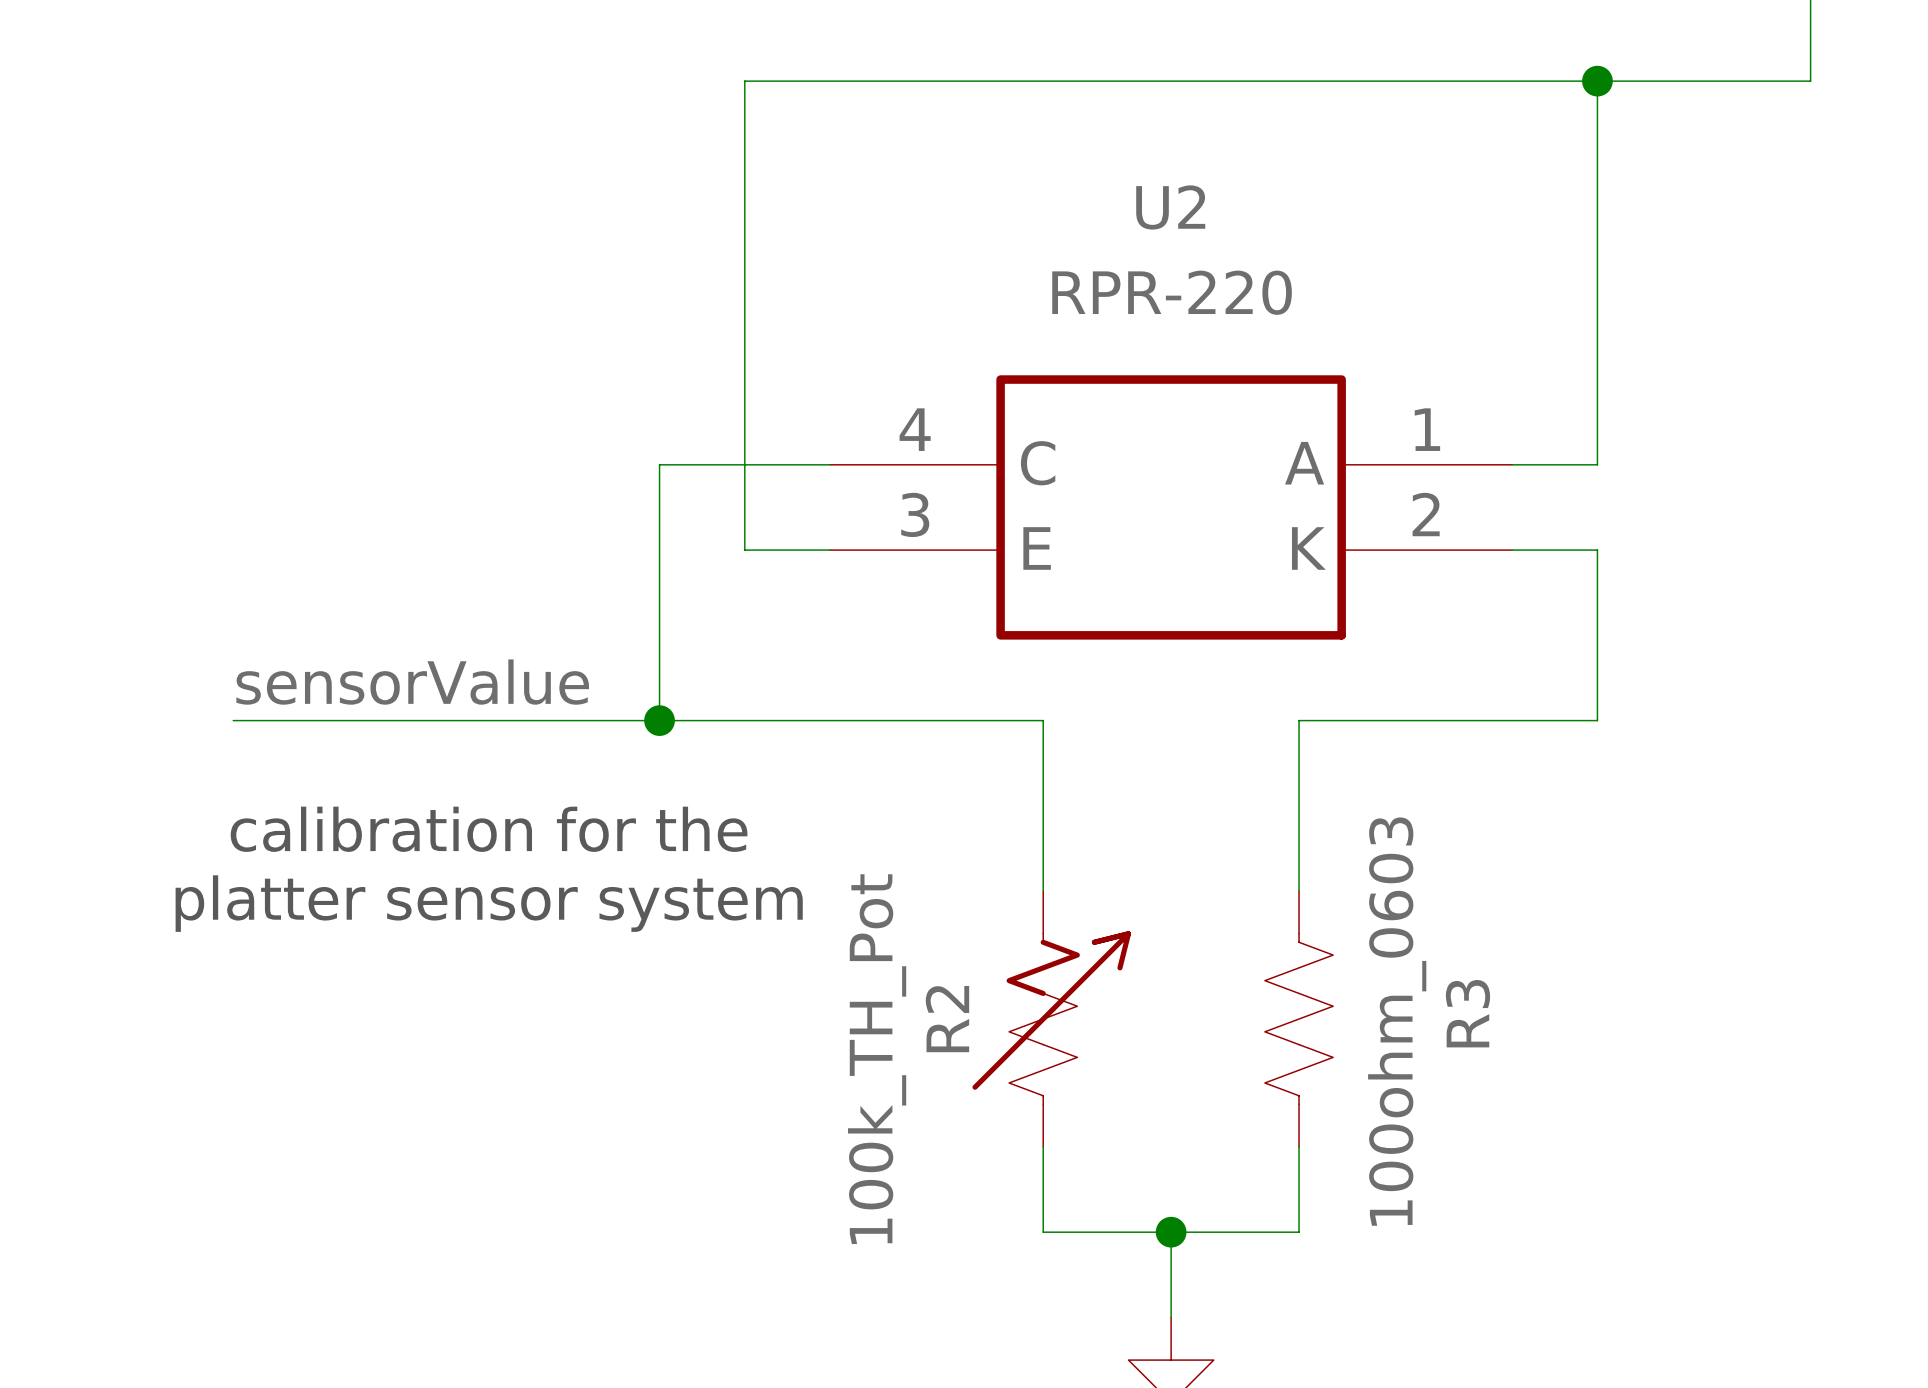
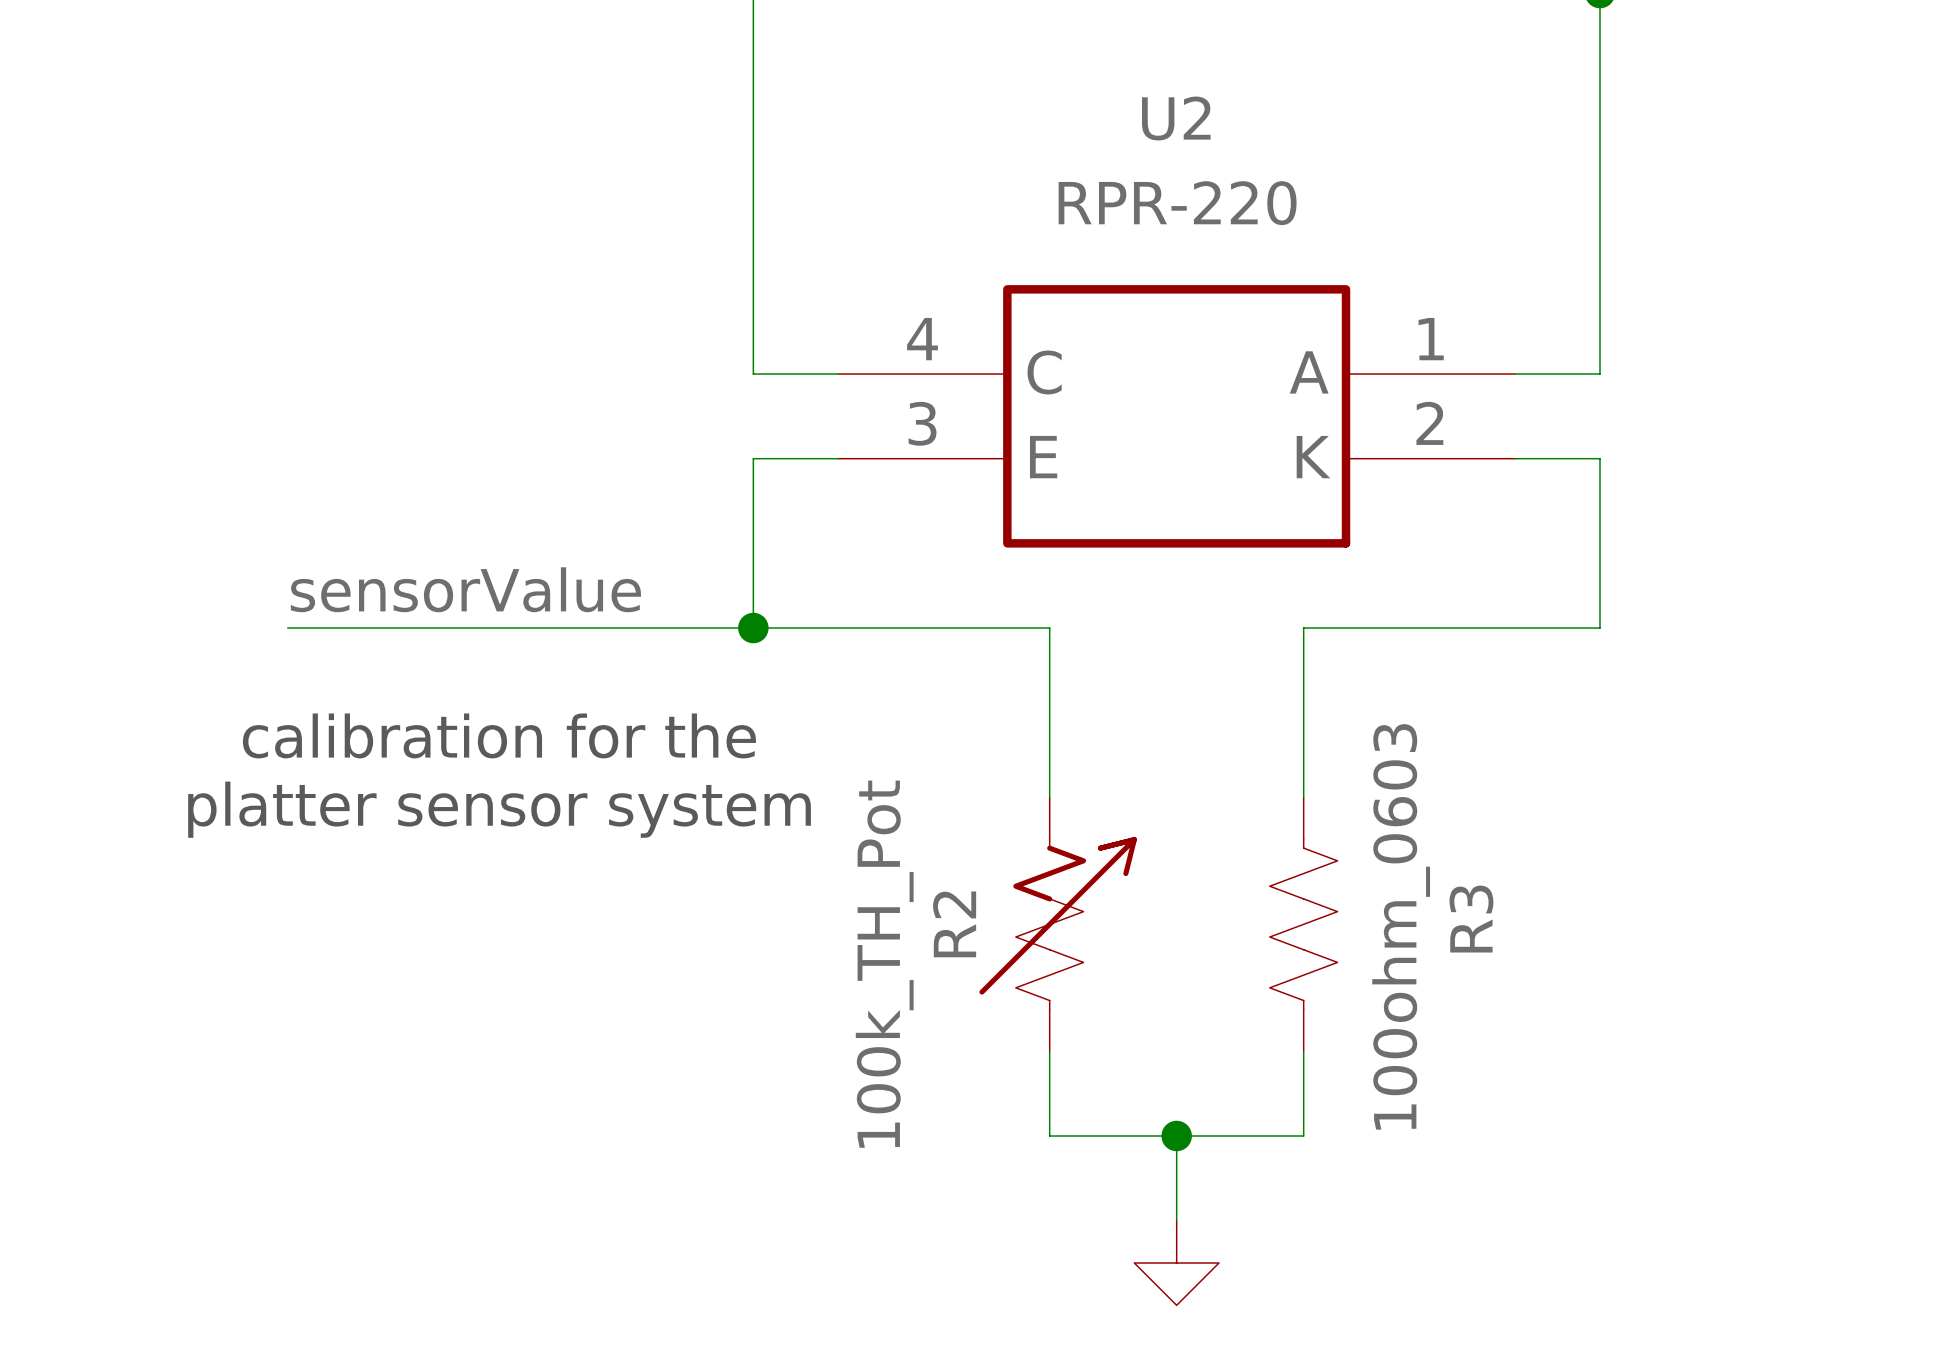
wire: (744, 550) (744, 464) (659, 464) (659, 720) -> (753, 458) (753, 628)
label position: sensorValue (412, 682) -> sensorValue (465, 589)
wire: (233, 720) (275, 720) -> none
junction position: (659, 720) -> (753, 628)

